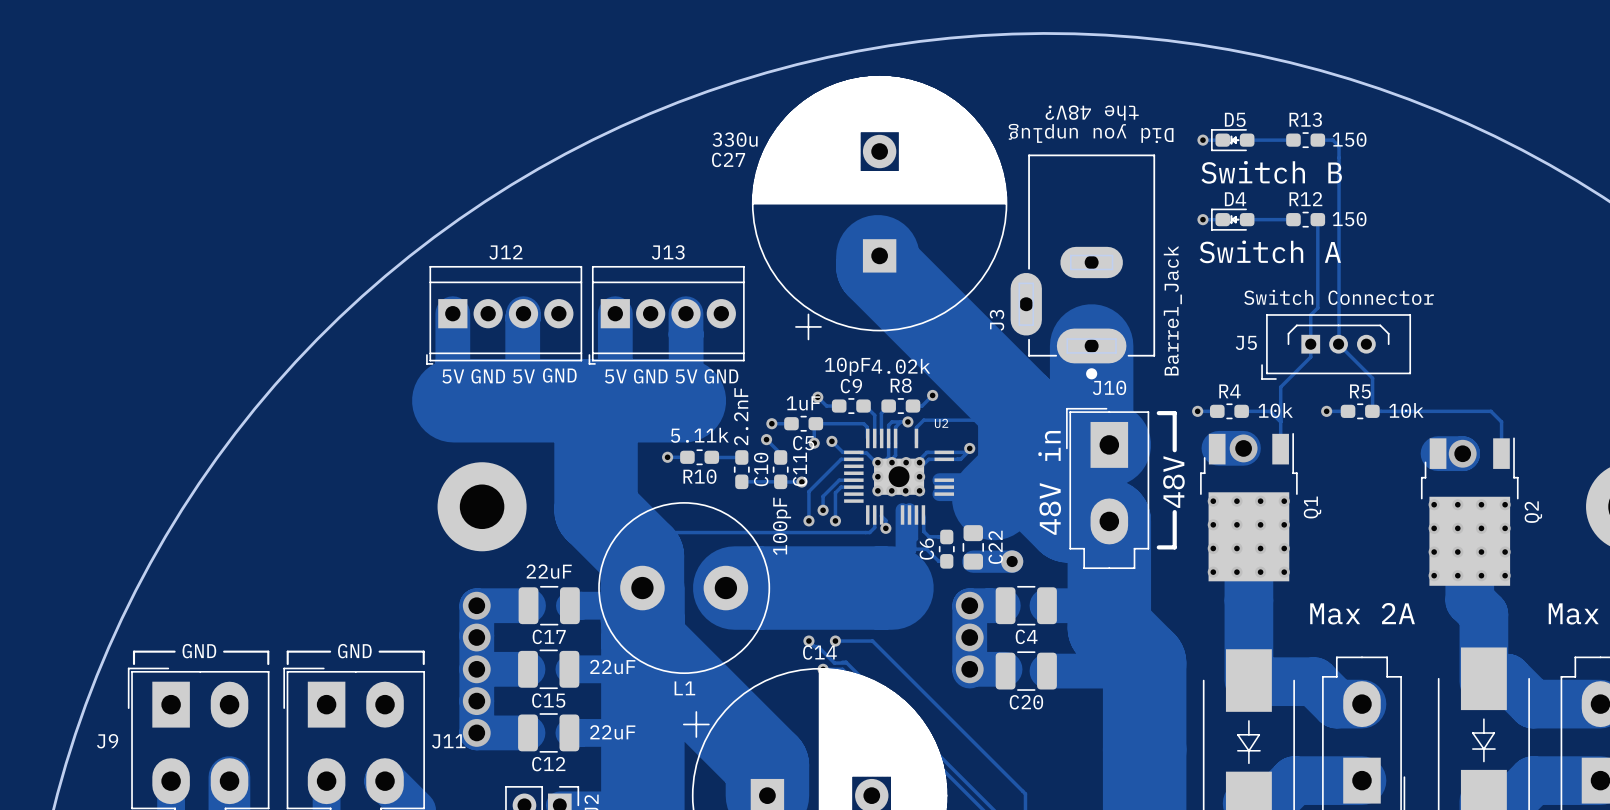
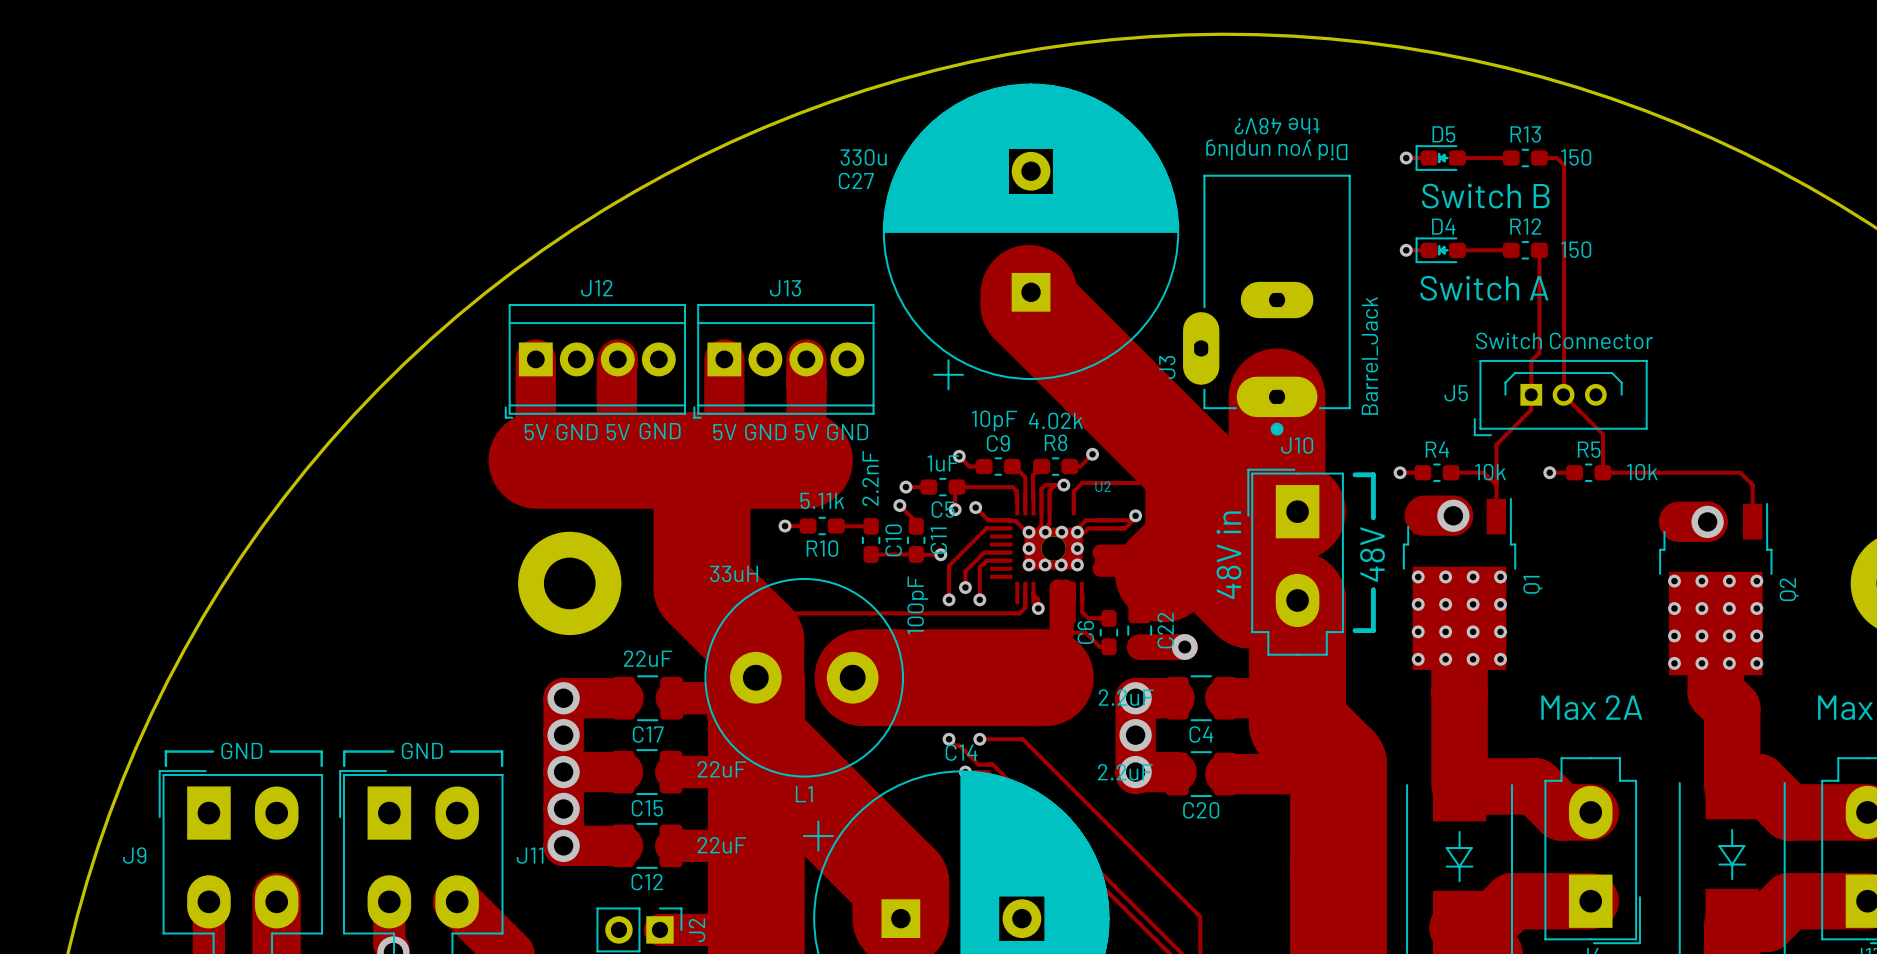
L1 value: none -> 33uH (734, 573)
C4 value: none -> 2.2uF (1126, 697)
C20 value: none -> 2.2uF (1125, 772)

